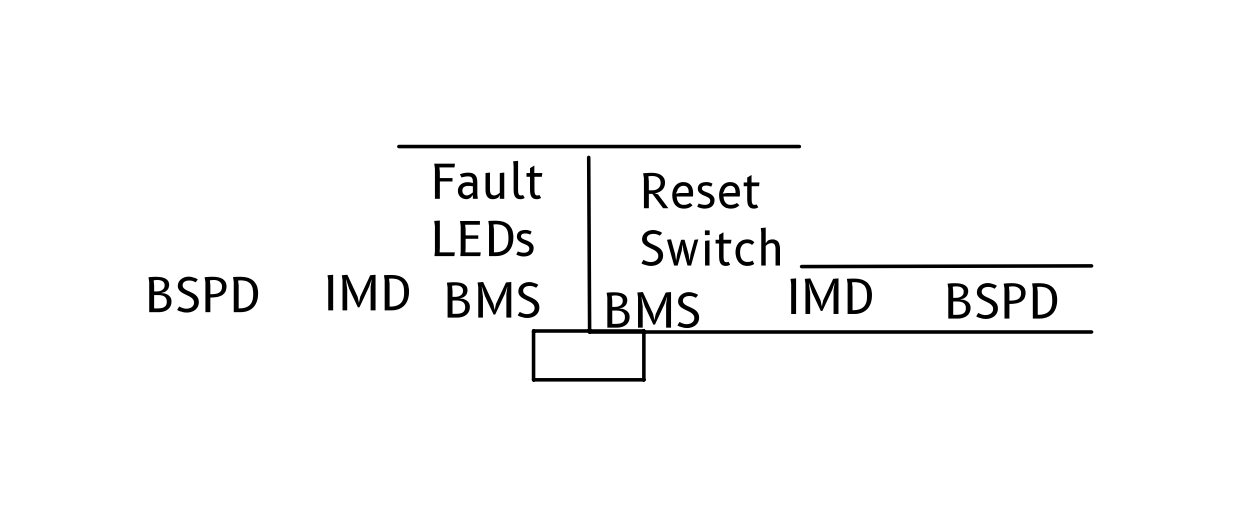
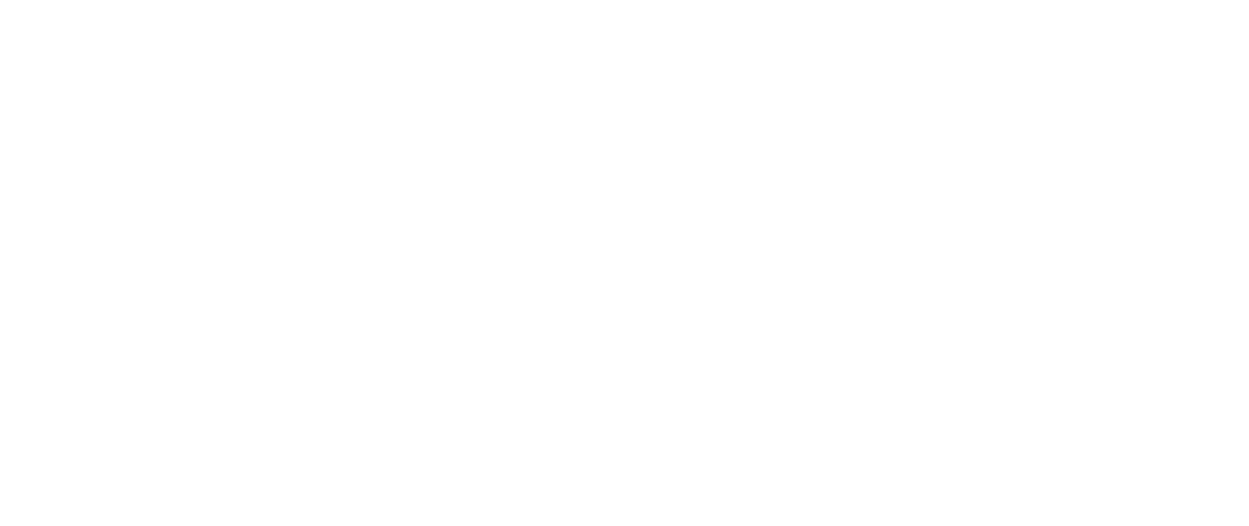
line: (398, 146) (799, 146) -> none
line: (588, 157) (589, 332) (1091, 332) -> none
text: Fault (488, 180) -> none
text: Reset (701, 190) -> none
text: LEDs (483, 238) -> none
text: Switch (710, 246) -> none
line: (1091, 265) (801, 266) -> none
text: IMD (368, 292) -> none
text: BSPD (203, 294) -> none
text: IMD (831, 296) -> none
text: BMS (493, 299) -> none
text: BSPD (1002, 301) -> none
text: BMS (652, 310) -> none
line: (533, 330) (643, 330) (643, 379) (533, 379) (533, 330) -> none

